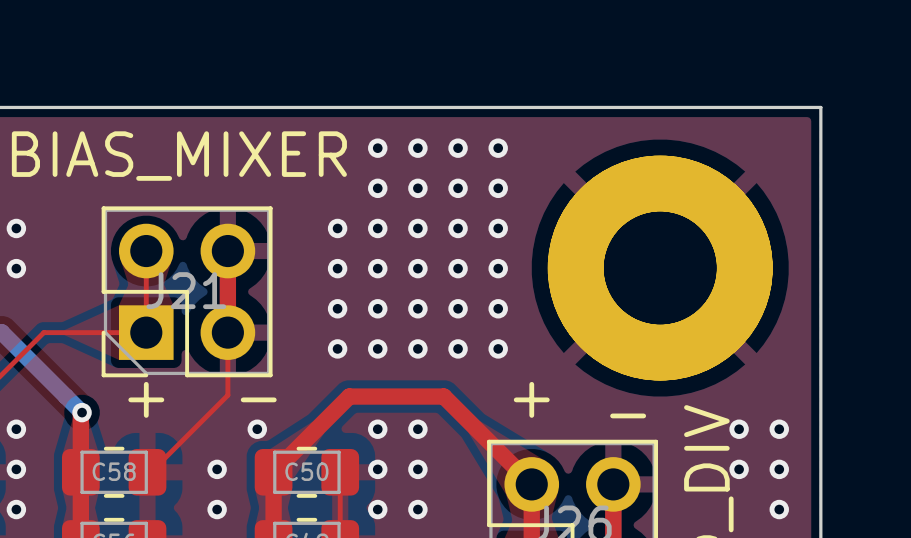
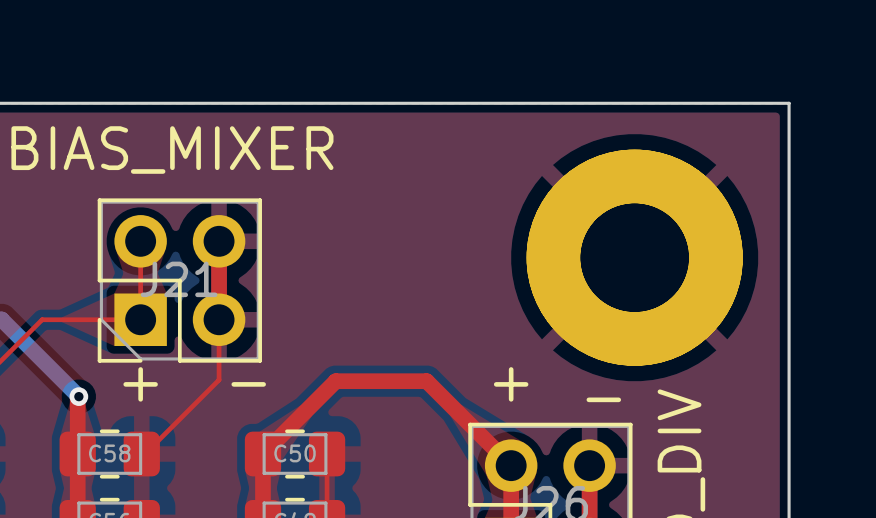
via: (377, 148) -> none
via: (417, 148) -> none
via: (458, 148) -> none
via: (498, 148) -> none
via: (377, 188) -> none
via: (417, 188) -> none
via: (458, 188) -> none
via: (498, 188) -> none
via: (16, 228) -> none
via: (337, 228) -> none
via: (377, 228) -> none
via: (417, 228) -> none
via: (458, 228) -> none
via: (498, 228) -> none
via: (16, 268) -> none
via: (337, 268) -> none
via: (377, 268) -> none
via: (417, 268) -> none
via: (458, 268) -> none
via: (498, 268) -> none
via: (337, 308) -> none
via: (377, 308) -> none
via: (417, 308) -> none
via: (458, 308) -> none
via: (498, 308) -> none
via: (337, 348) -> none
via: (377, 348) -> none
via: (417, 348) -> none
via: (458, 348) -> none
via: (498, 348) -> none
via: (16, 429) -> none
via: (257, 429) -> none
via: (377, 429) -> none
via: (417, 429) -> none
via: (739, 429) -> none
via: (779, 429) -> none
via: (16, 469) -> none
via: (217, 469) -> none
via: (377, 469) -> none
via: (417, 469) -> none
via: (739, 469) -> none
via: (779, 469) -> none
via: (16, 509) -> none
via: (217, 509) -> none
via: (377, 509) -> none
via: (417, 509) -> none
via: (779, 509) -> none

